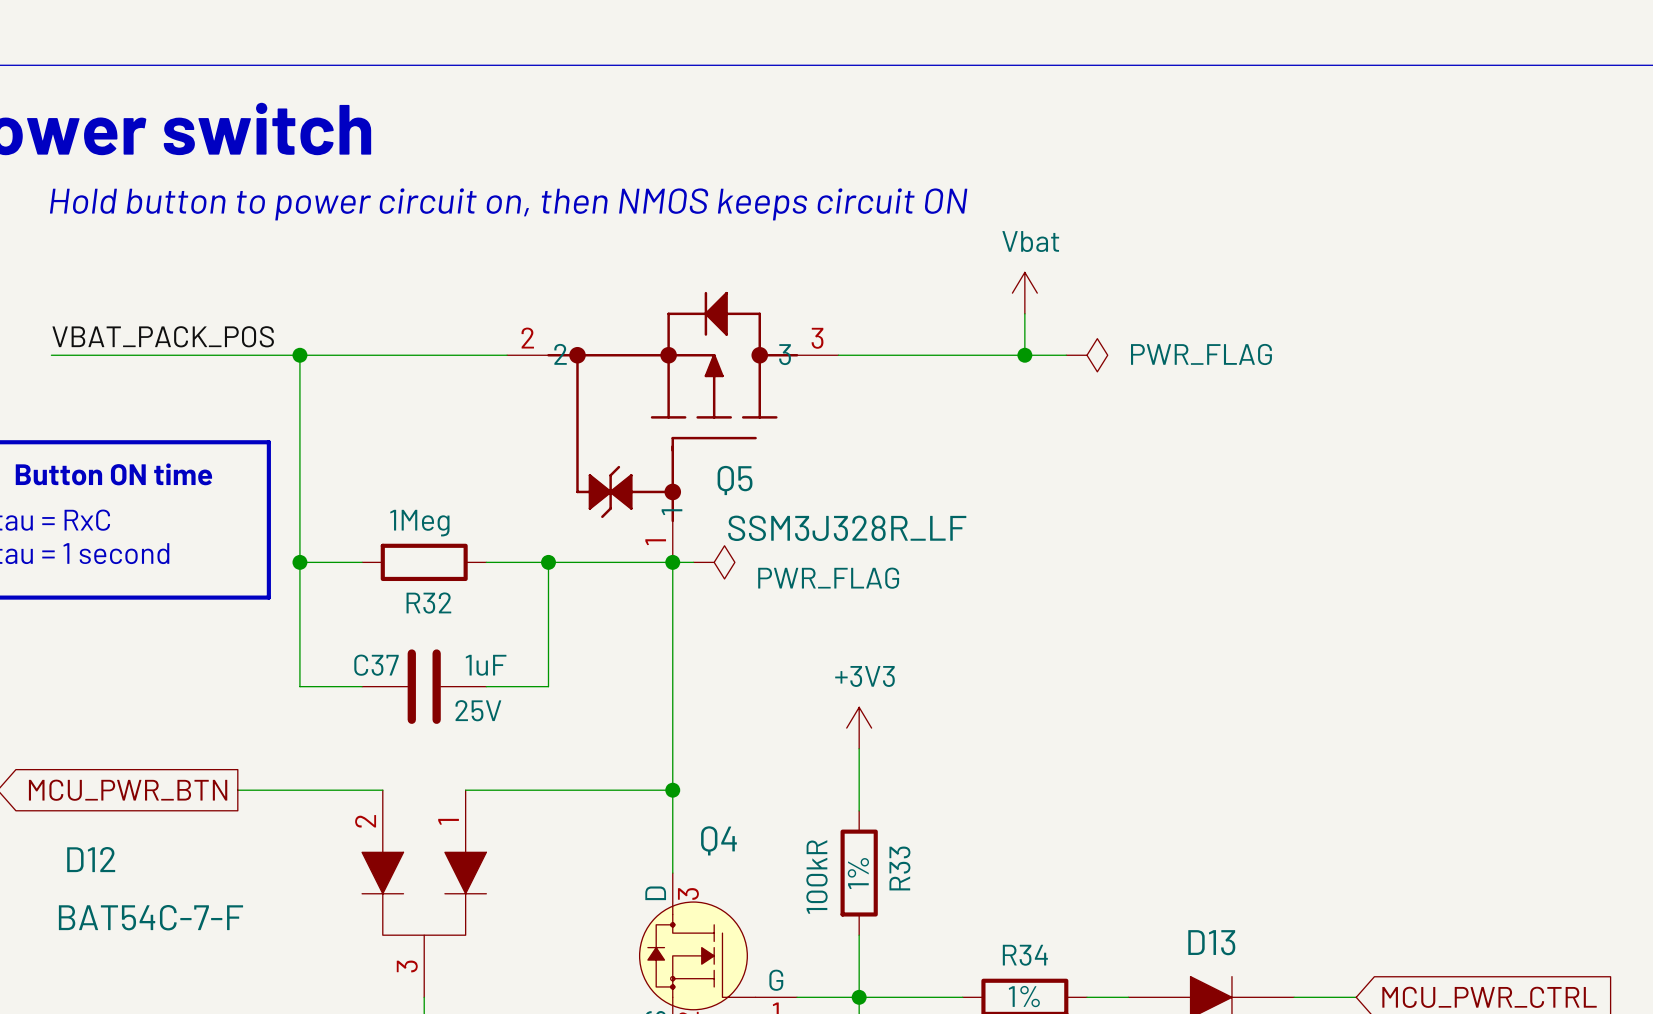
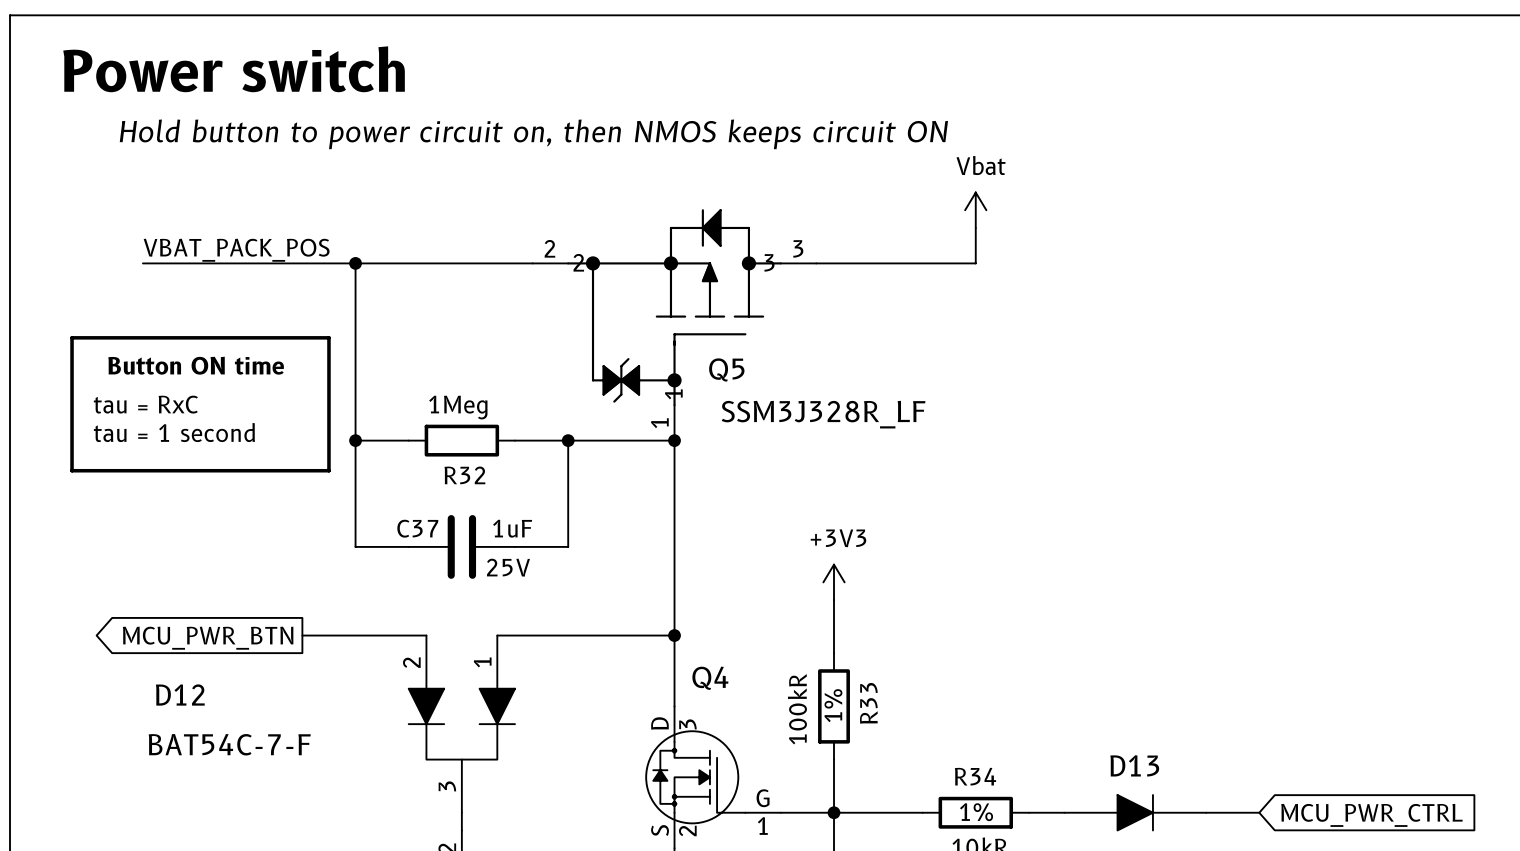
wire: (1024, 355) (1066, 355) -> none
junction: (1024, 355) -> none
power symbol: PWR_FLAG (1087, 355) -> none
wire: (672, 562) (693, 562) -> none
power symbol: PWR_FLAG (714, 562) -> none

